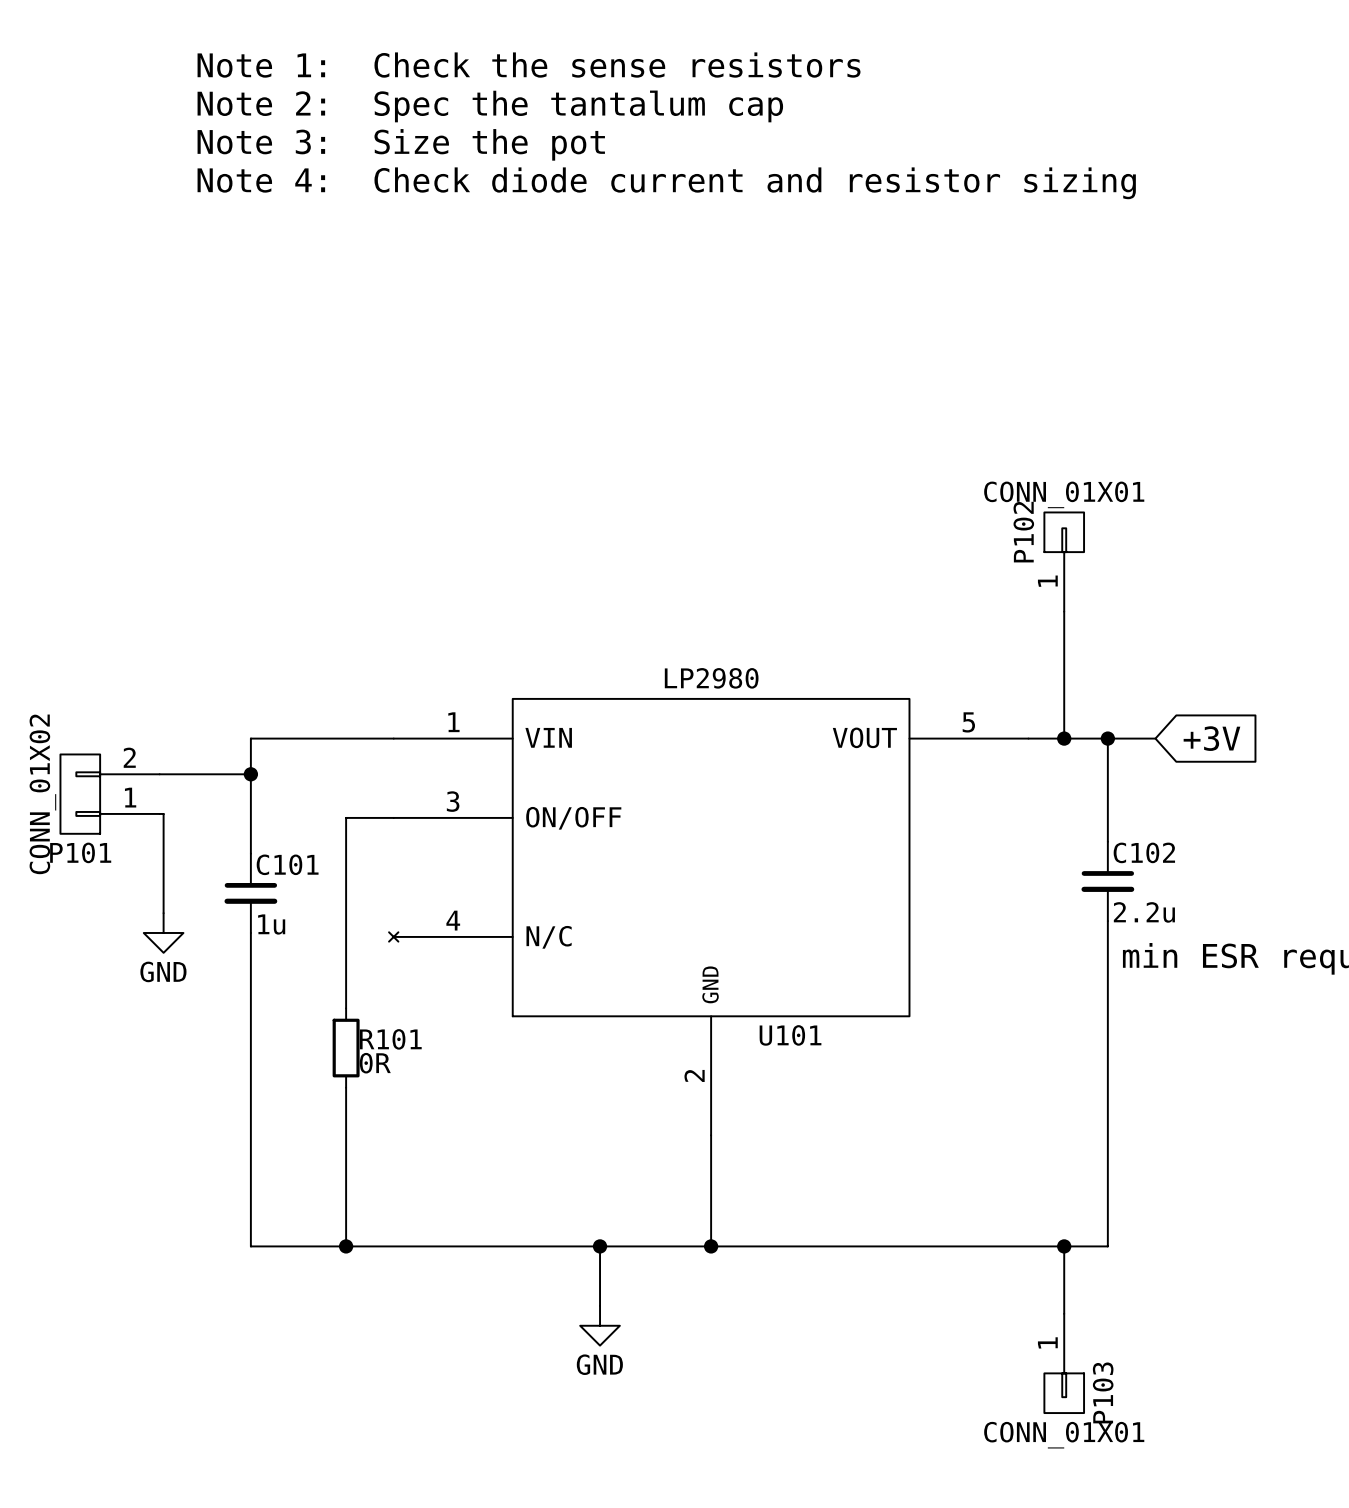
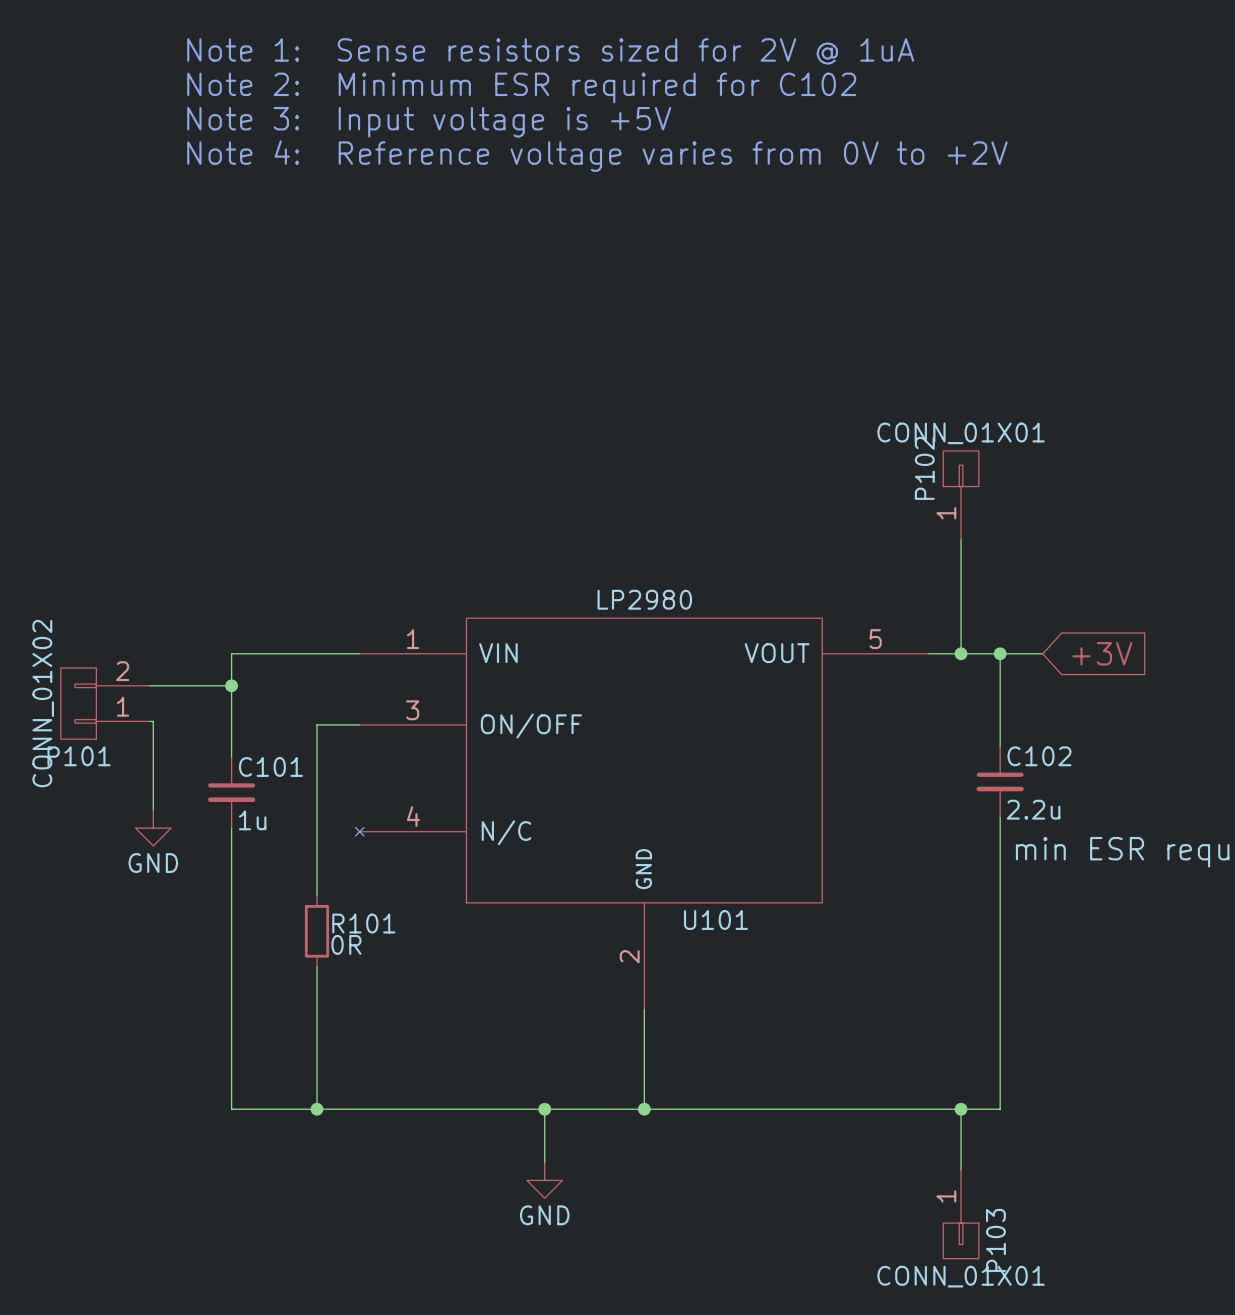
text: Note 1: Check the sense resistors (529, 65) -> Note 1: Sense resistors sized for 2V @ 1uA (550, 51)
text: Note 2: Spec the tantalum cap (490, 106) -> Note 2: Minimum ESR required for C102 (521, 87)
text: Note 3: Size the pot (401, 144) -> Note 3: Input voltage is +5V (429, 122)
text: Note 4: Check diode current and resistor sizing (666, 183) -> Note 4: Reference voltage varies from 0V to +2V (597, 156)

